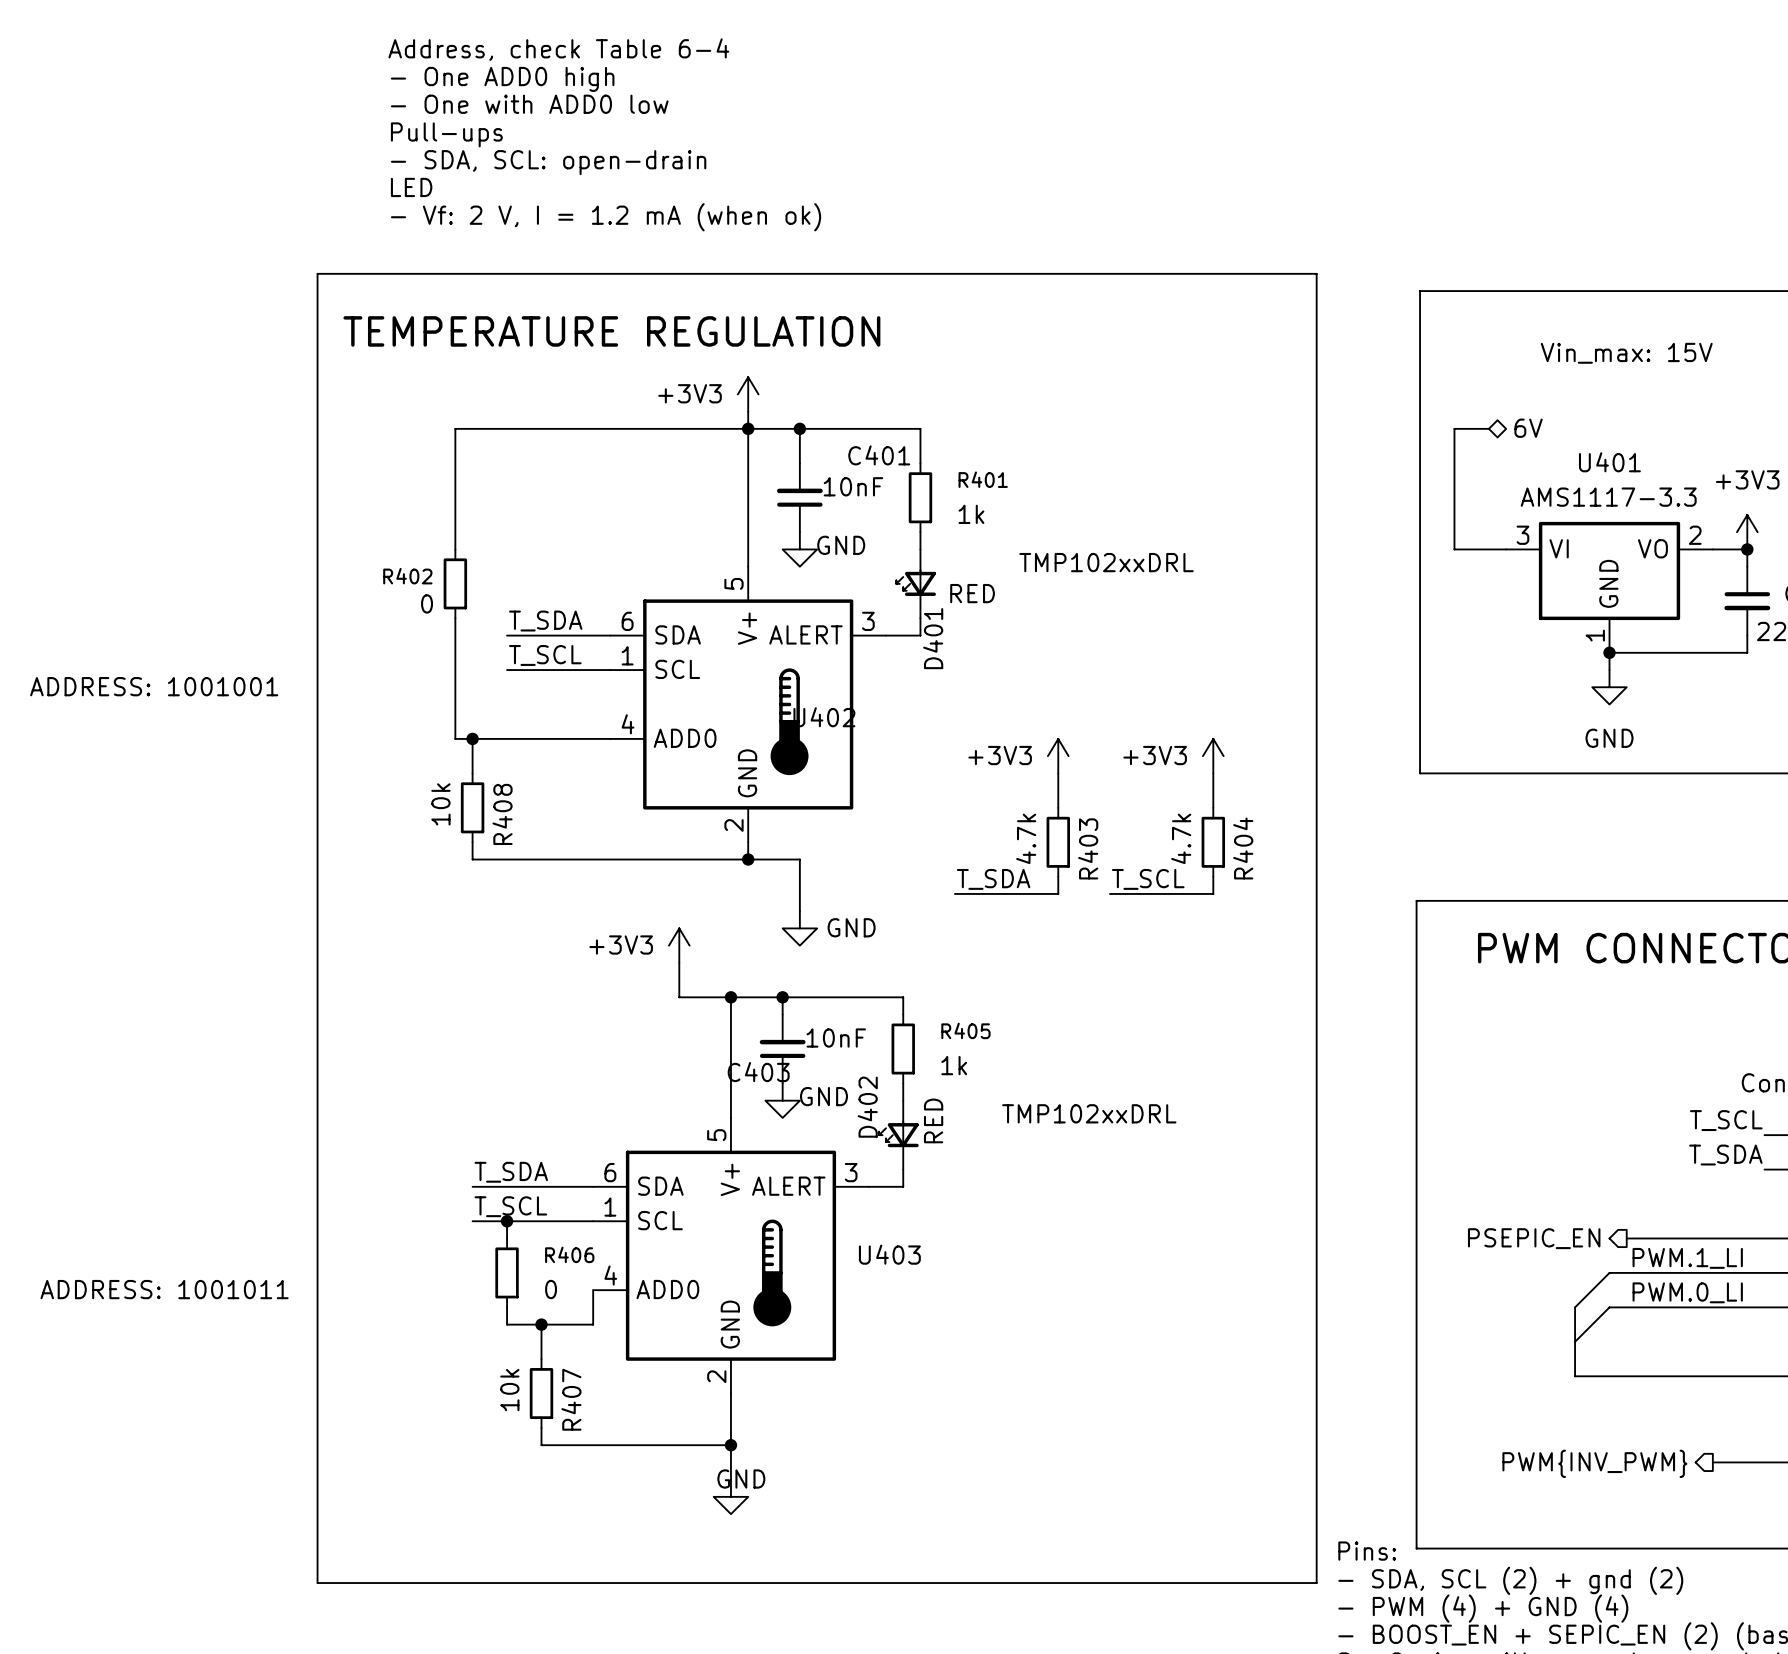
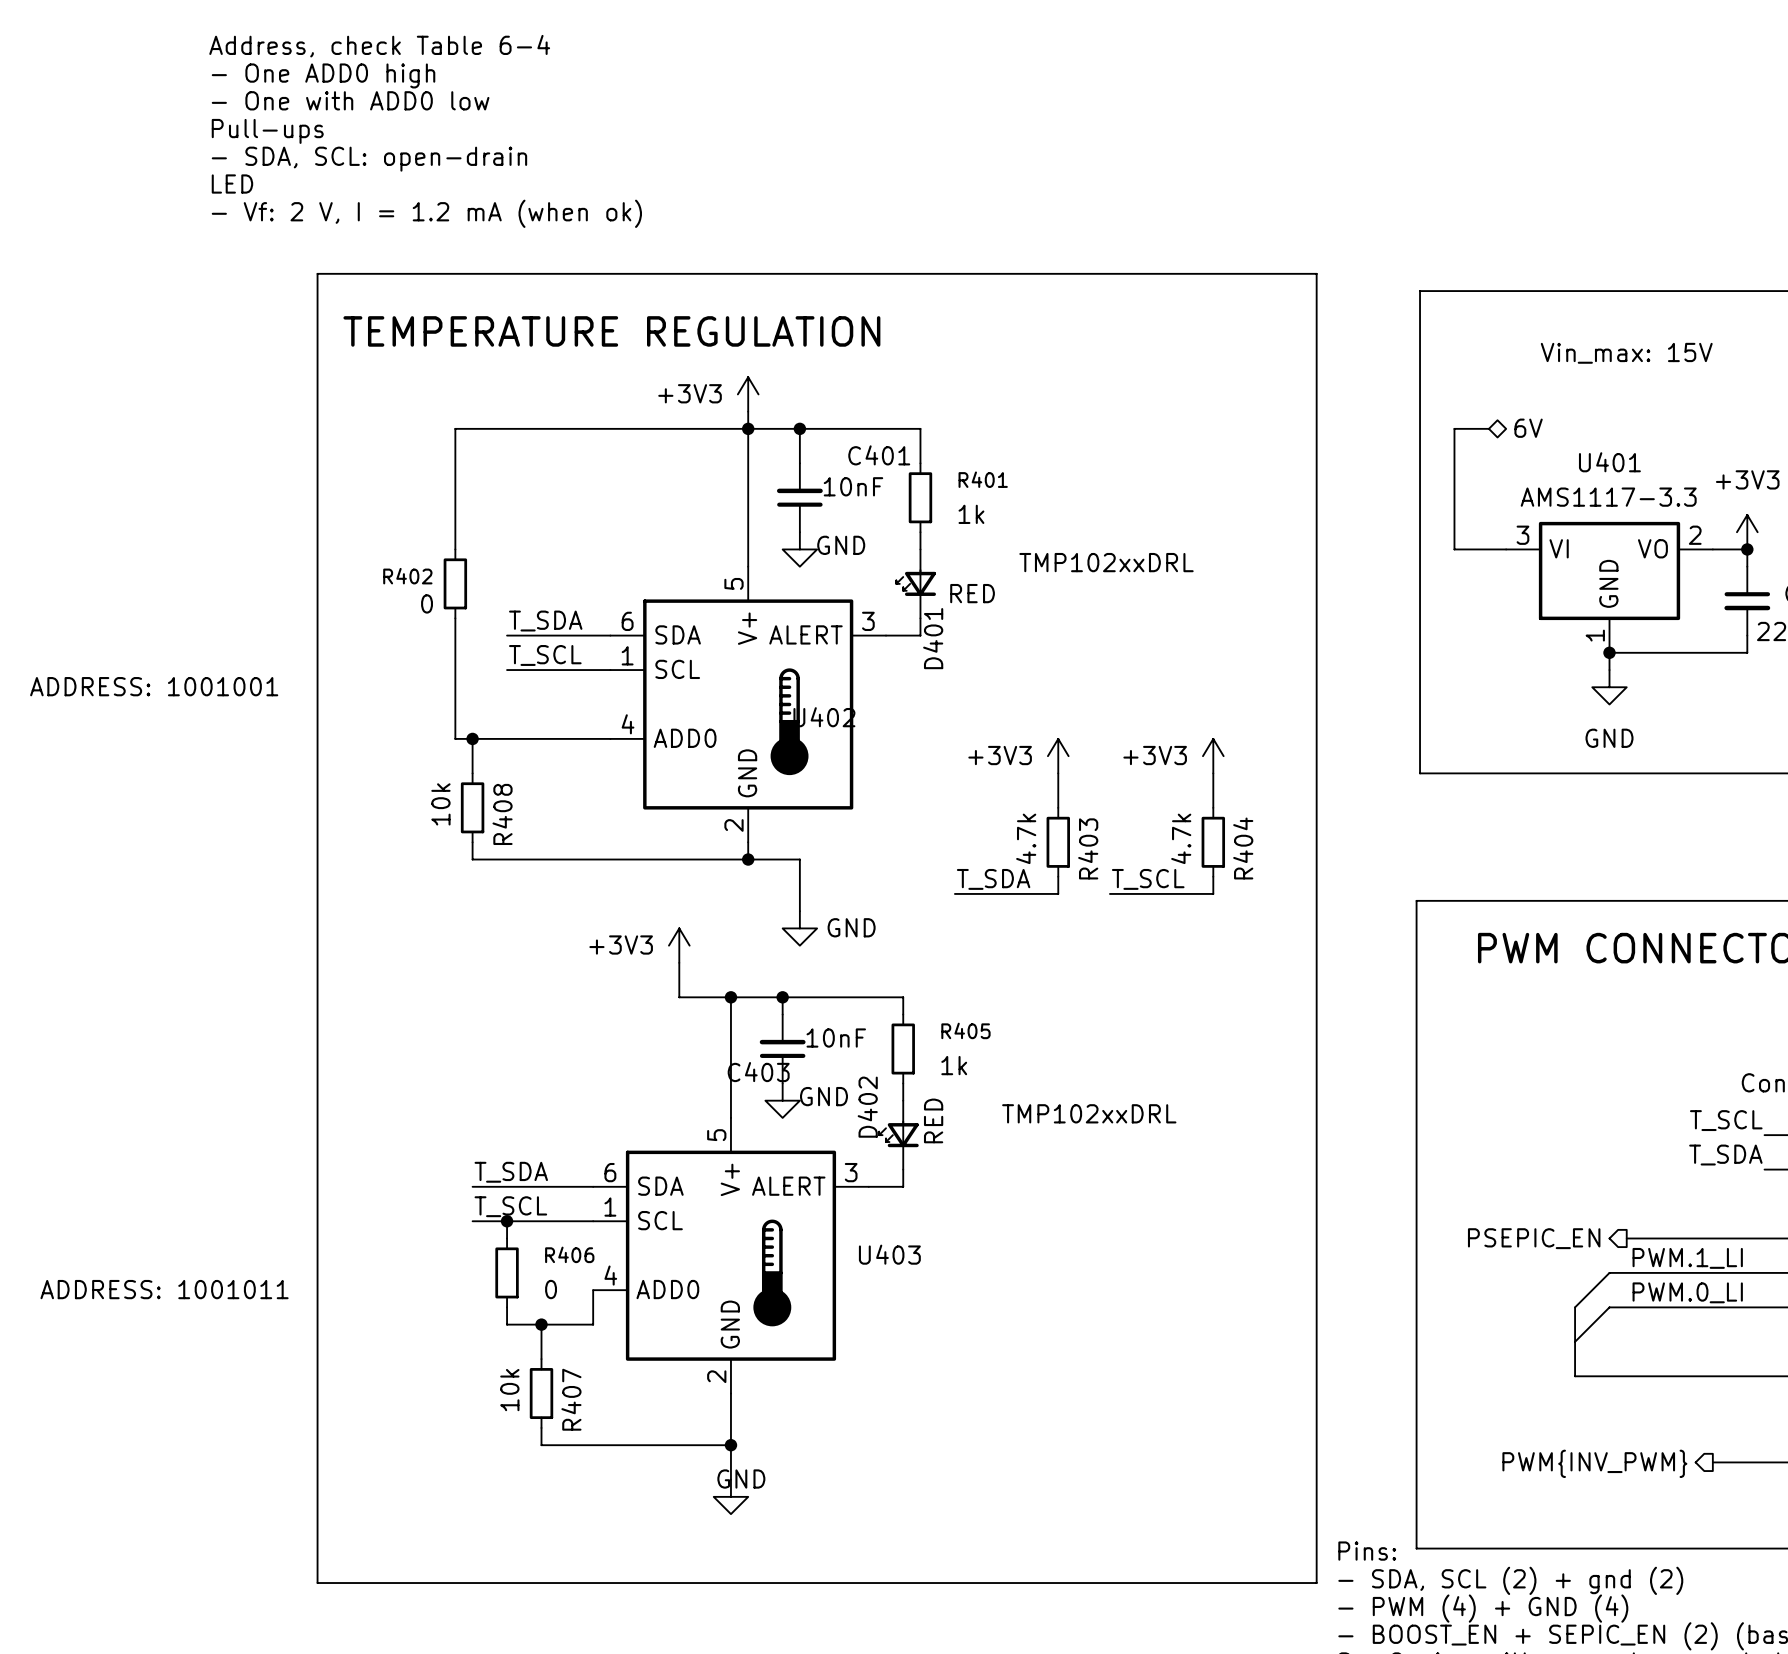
text position: Address, check Table 6-4 (558, 49) -> Address, check Table 6-4 (379, 46)
text position: - One ADD0 high (502, 79) -> - One ADD0 high (323, 75)
text position: - One with ADD0 low (529, 104) -> - One with ADD0 low (350, 100)
text position: Pull-ups (446, 134) -> Pull-ups (267, 131)
text position: - SDA, SCL: open-drain (548, 162) -> - SDA, SCL: open-drain (369, 159)
text position: LED (411, 187) -> LED (232, 184)
text position: - Vf: 2 V, I = 1.2 mA (when ok) (606, 217) -> - Vf: 2 V, I = 1.2 mA (when ok) (426, 213)

